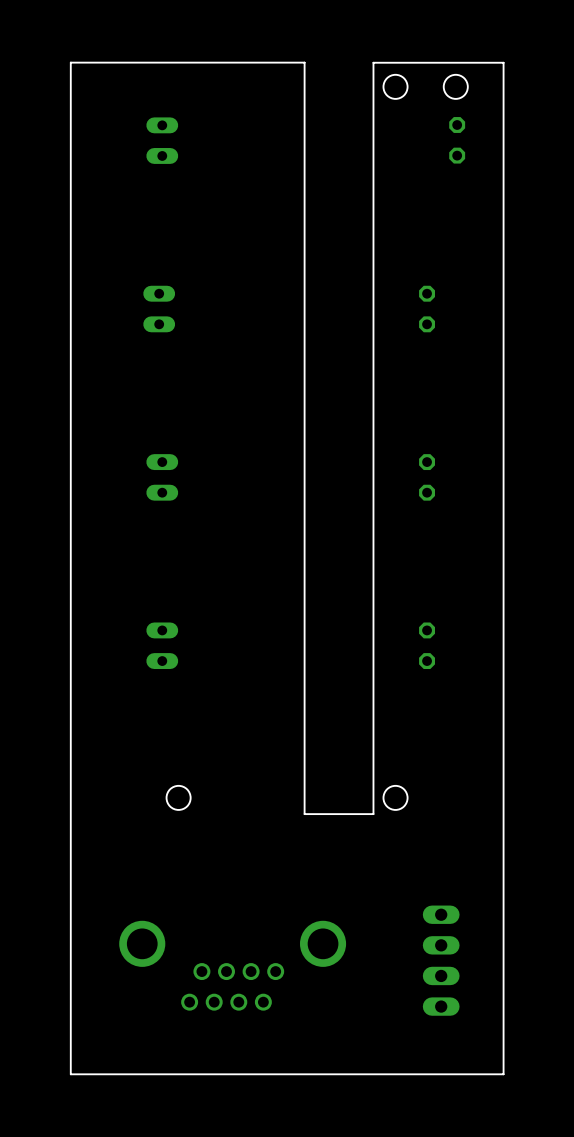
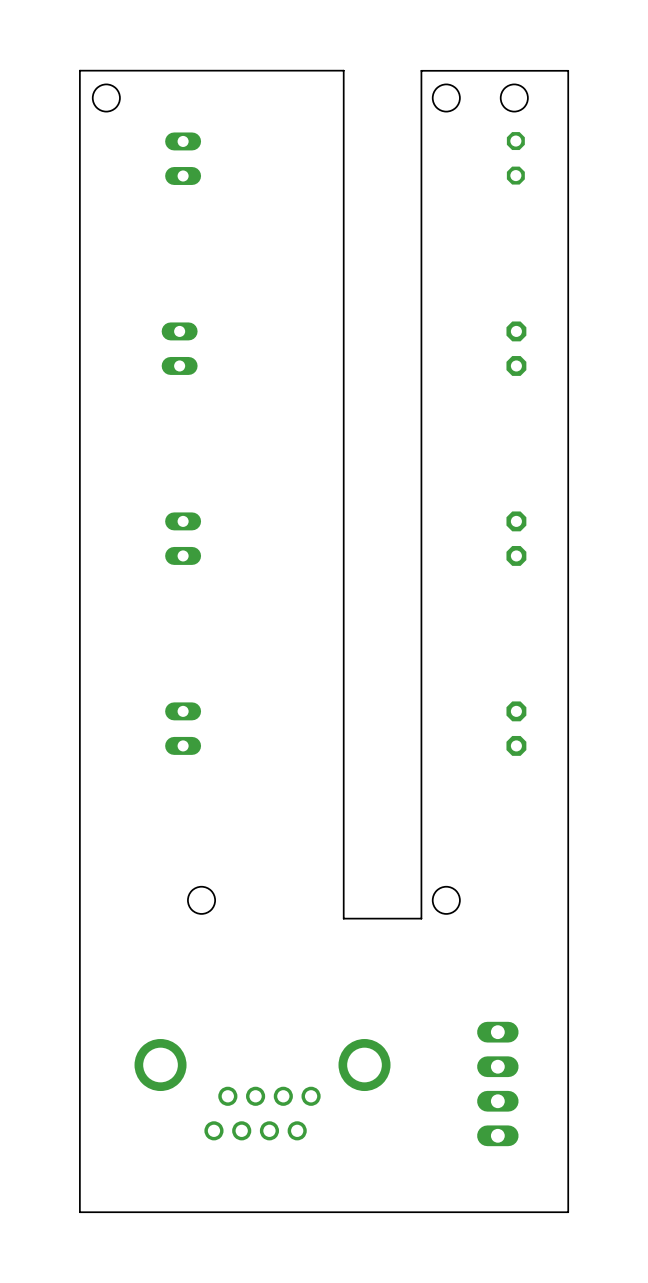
round board edge: none -> [92, 83, 121, 113]
part: (427, 309) -> none
part: none -> (516, 348)
part: (427, 477) -> none
part: none -> (516, 538)
part: (427, 645) -> none
part: none -> (516, 728)

